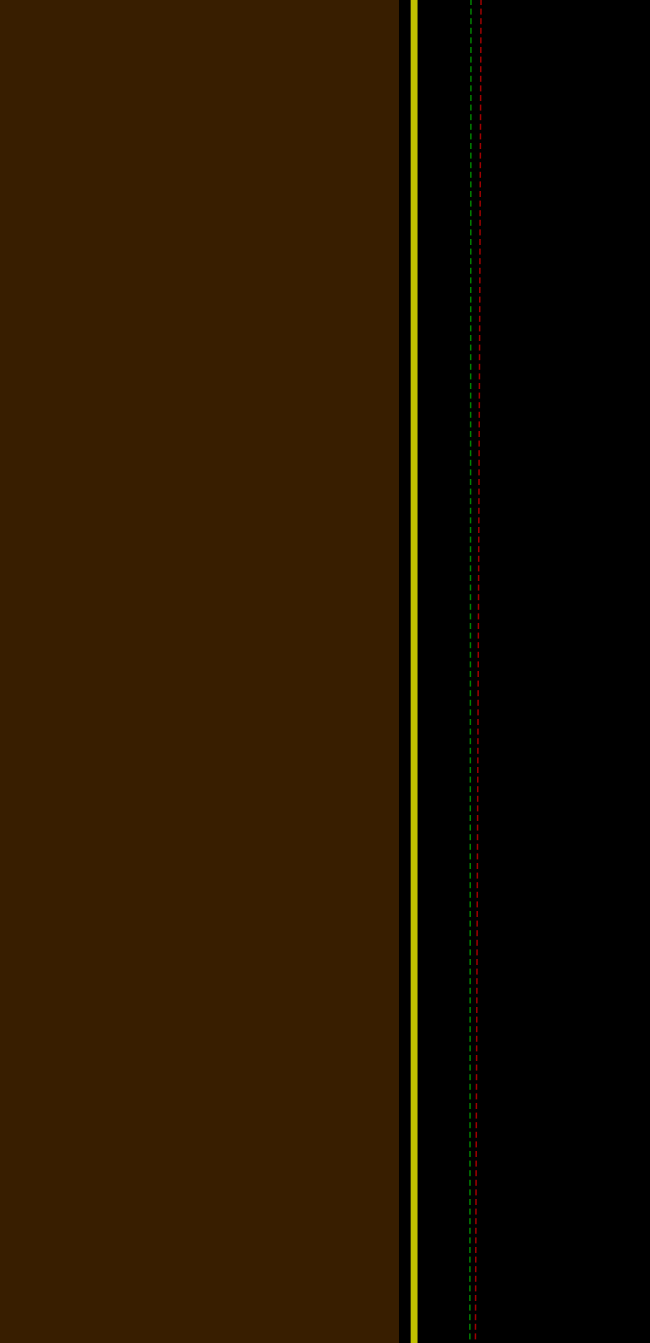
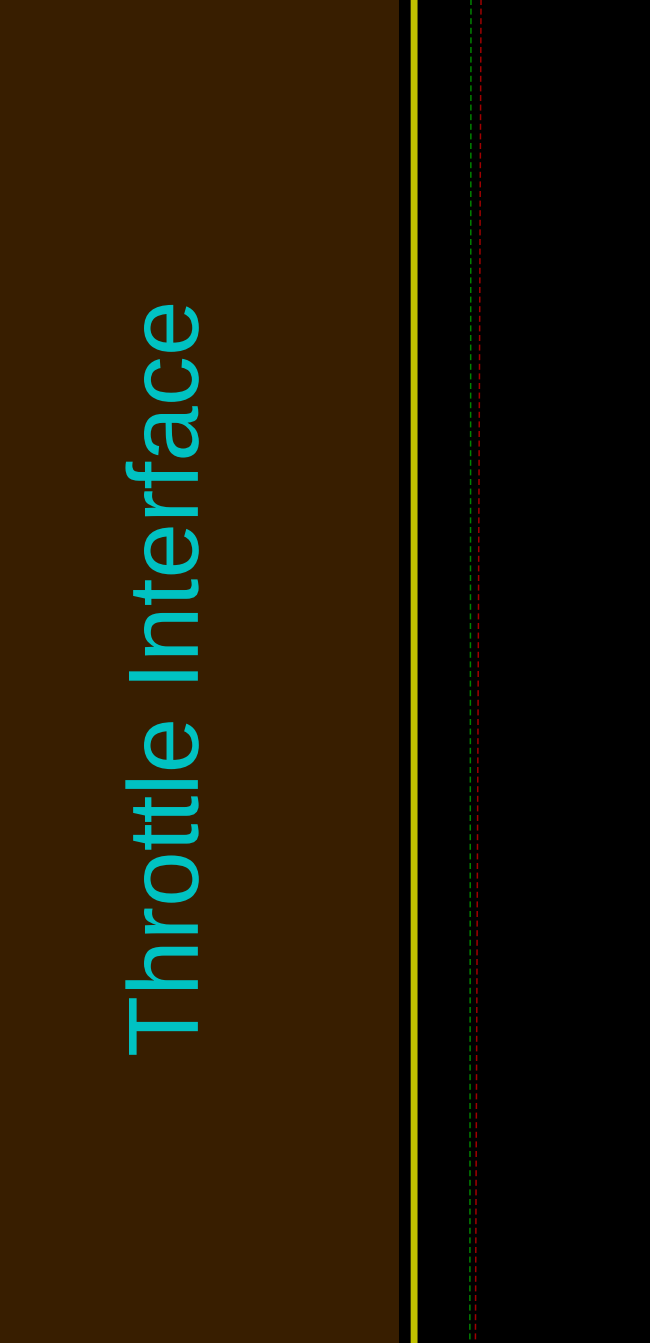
text: none -> Throttle Interface (162, 679)

